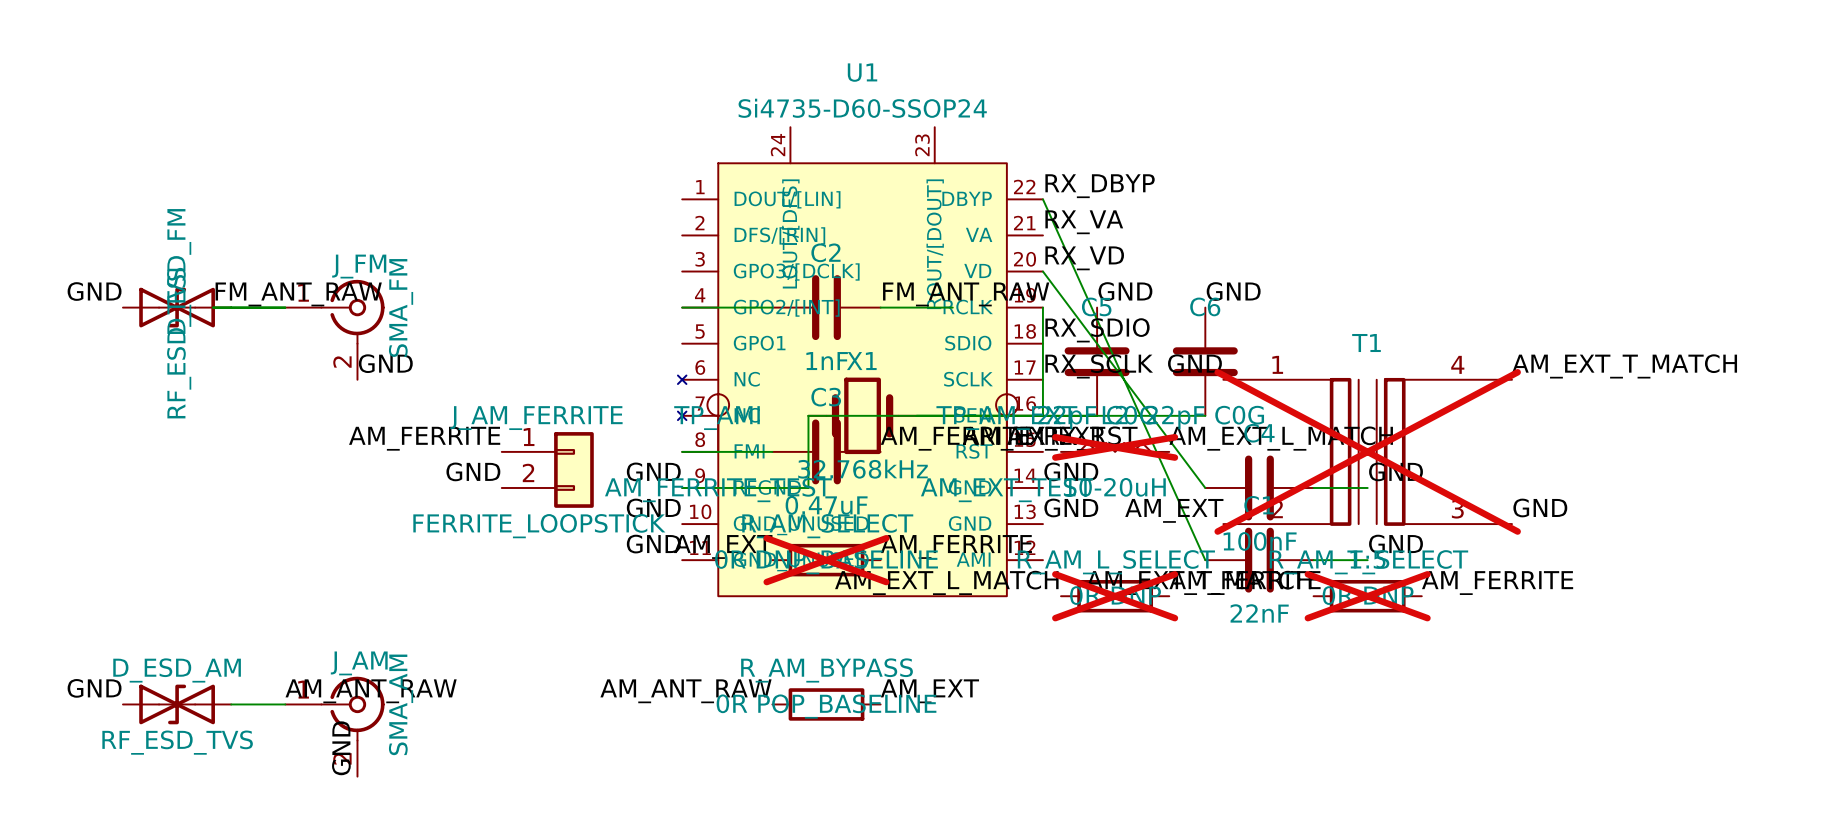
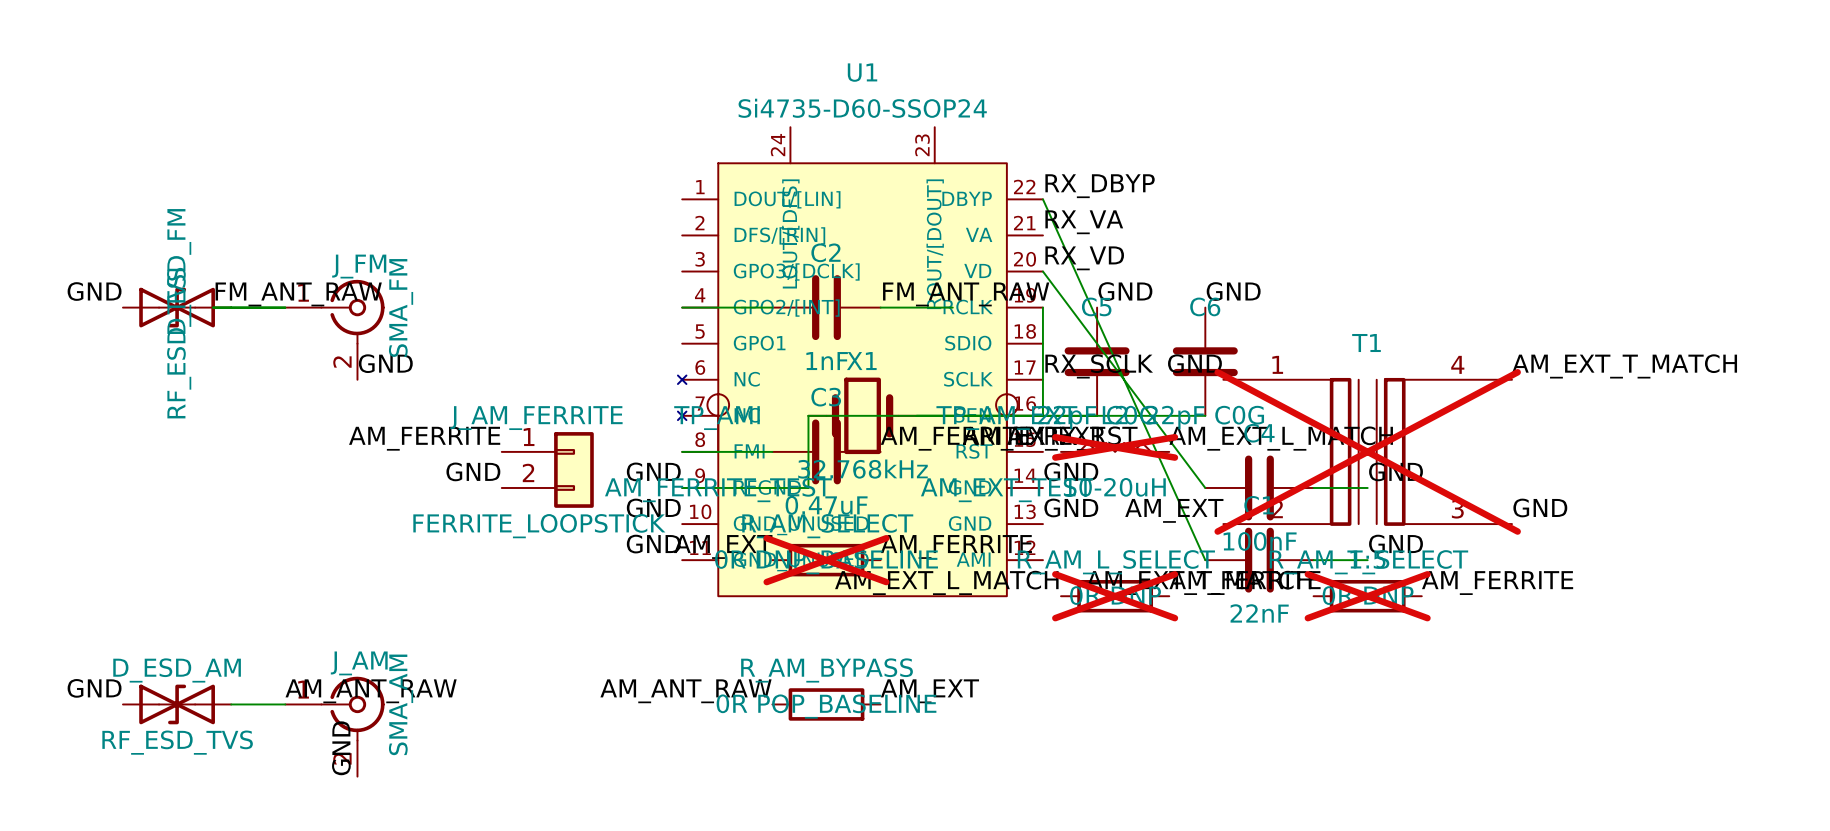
label: RX_SDIO (1097, 330) -> none

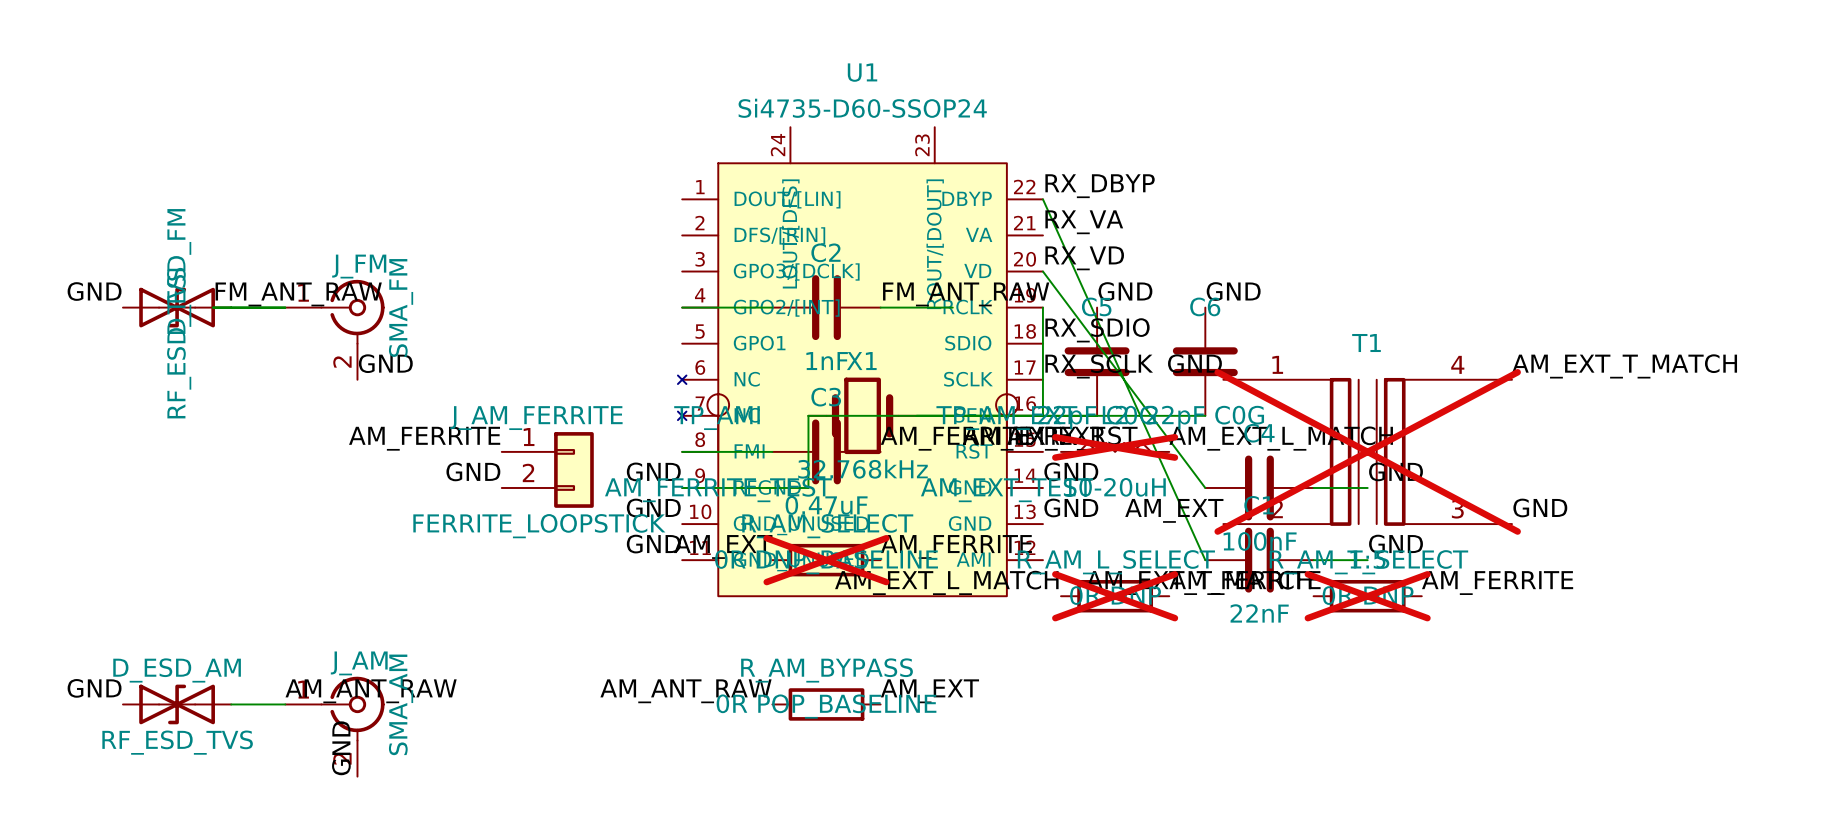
label: none -> RX_SDIO (1097, 330)

